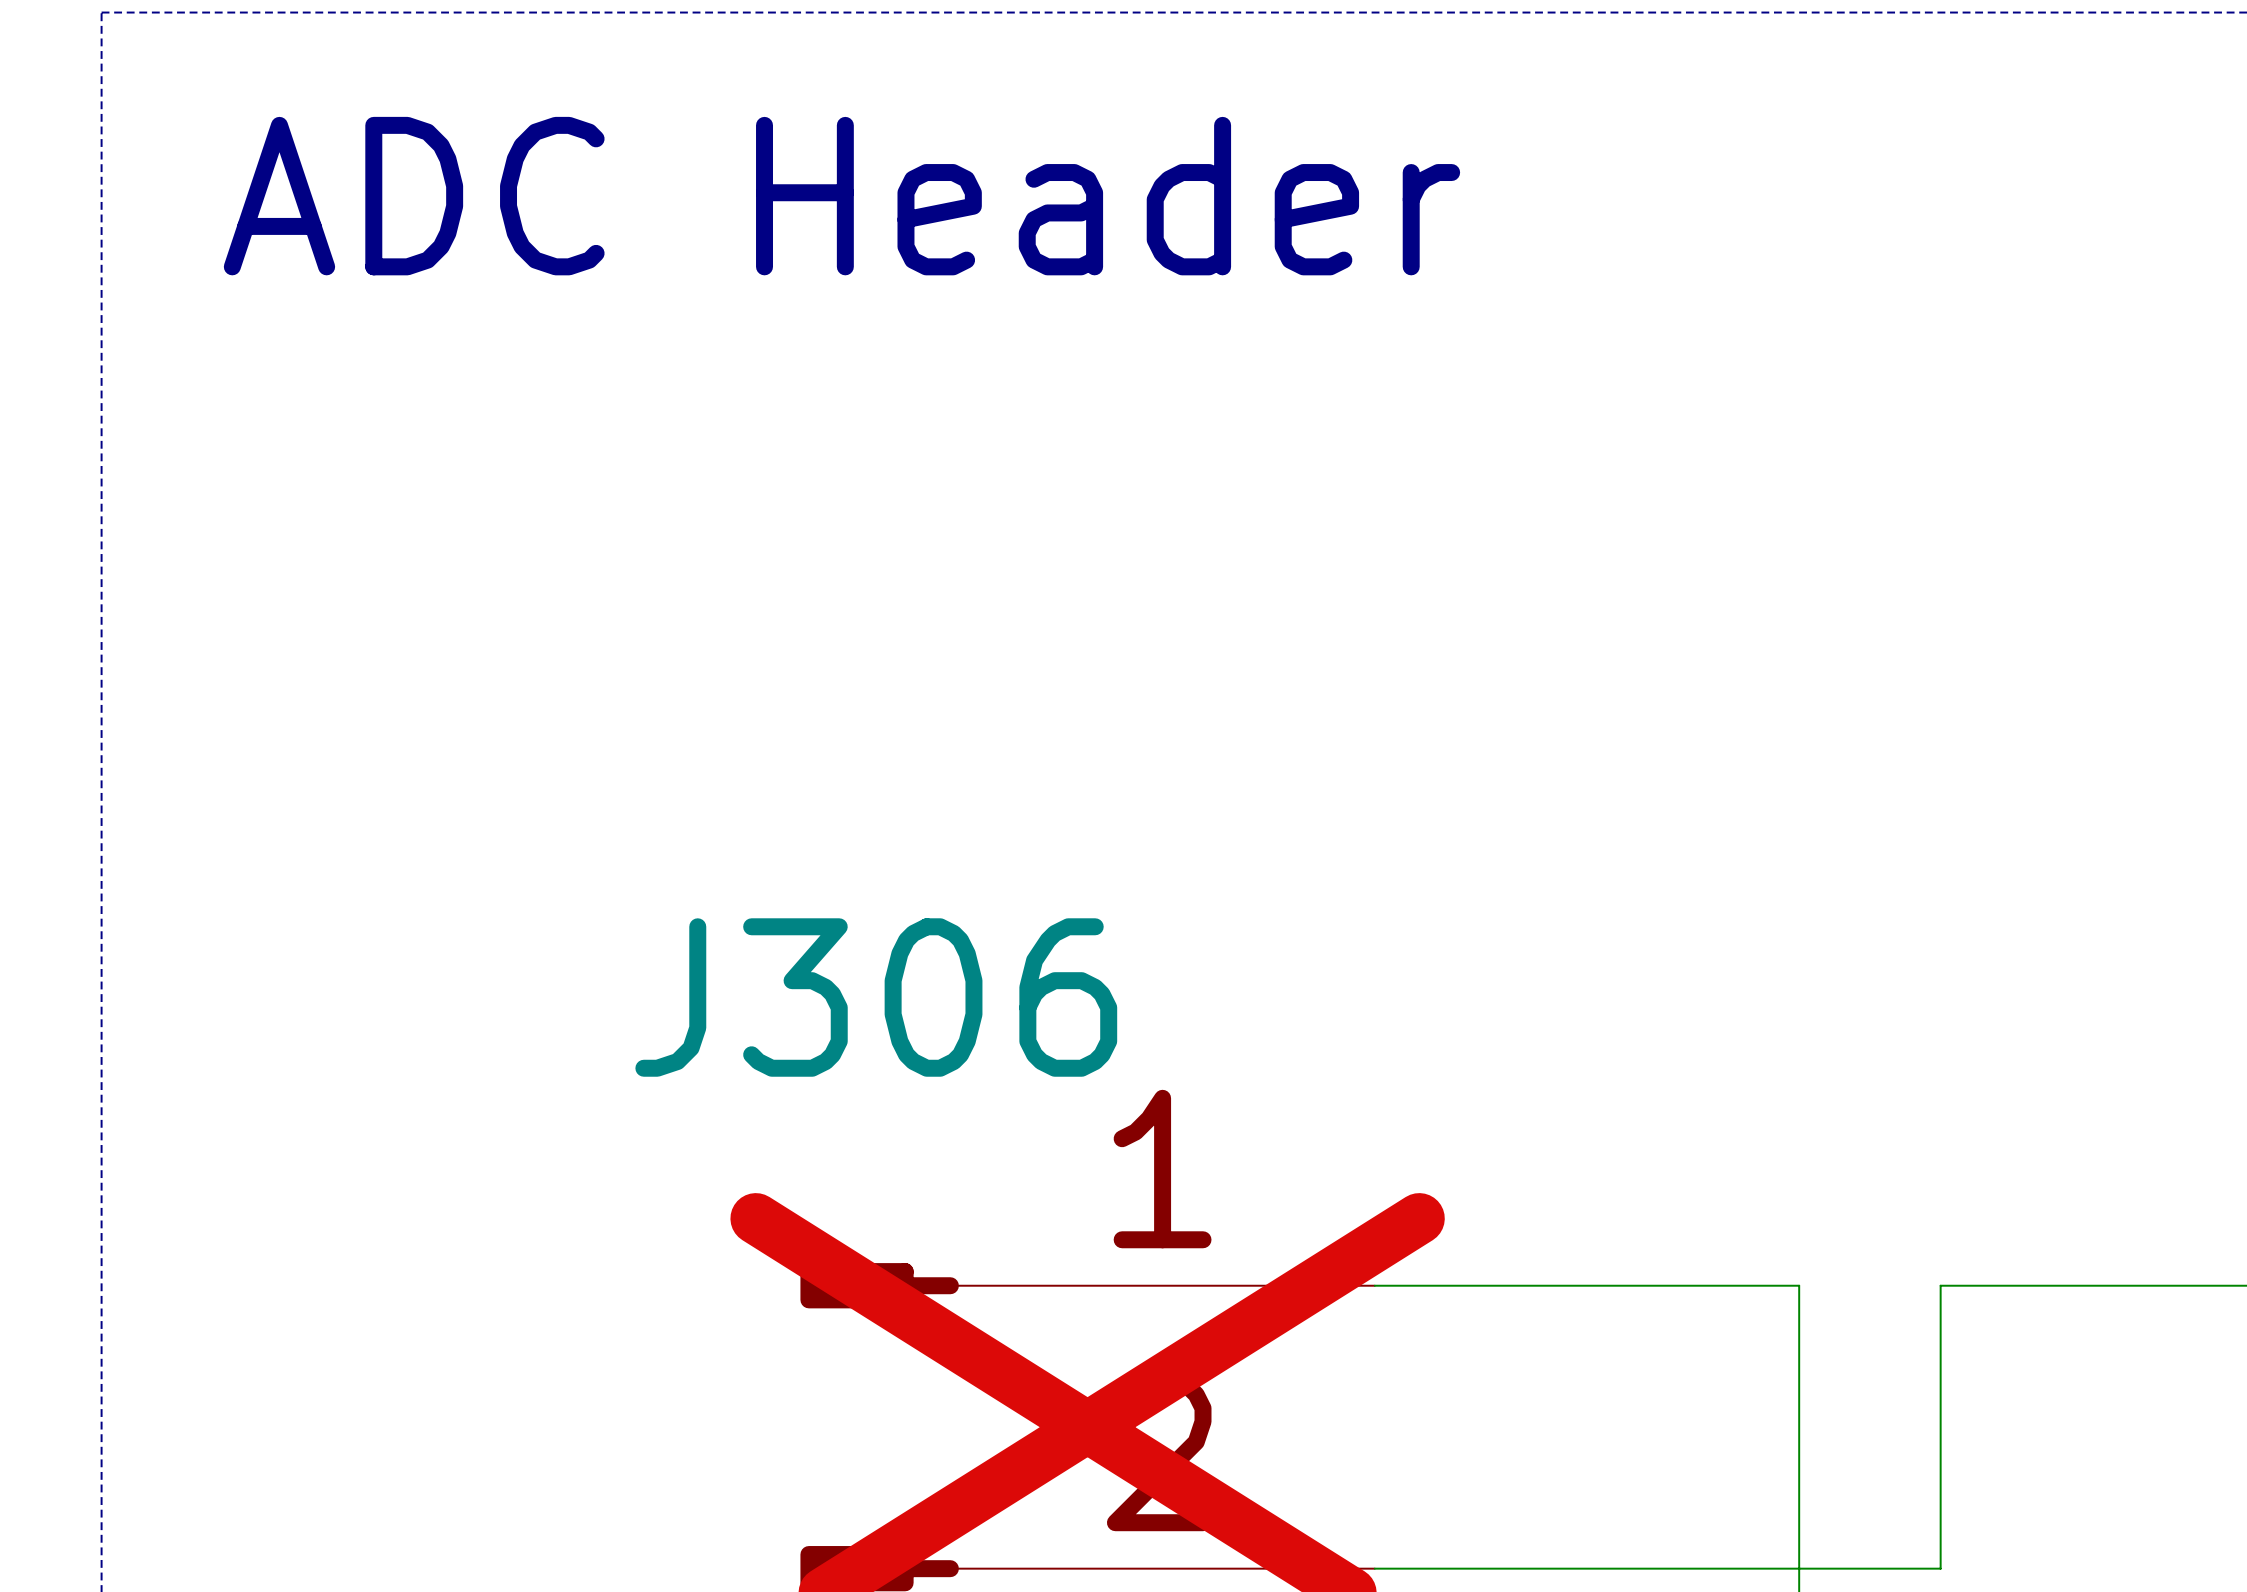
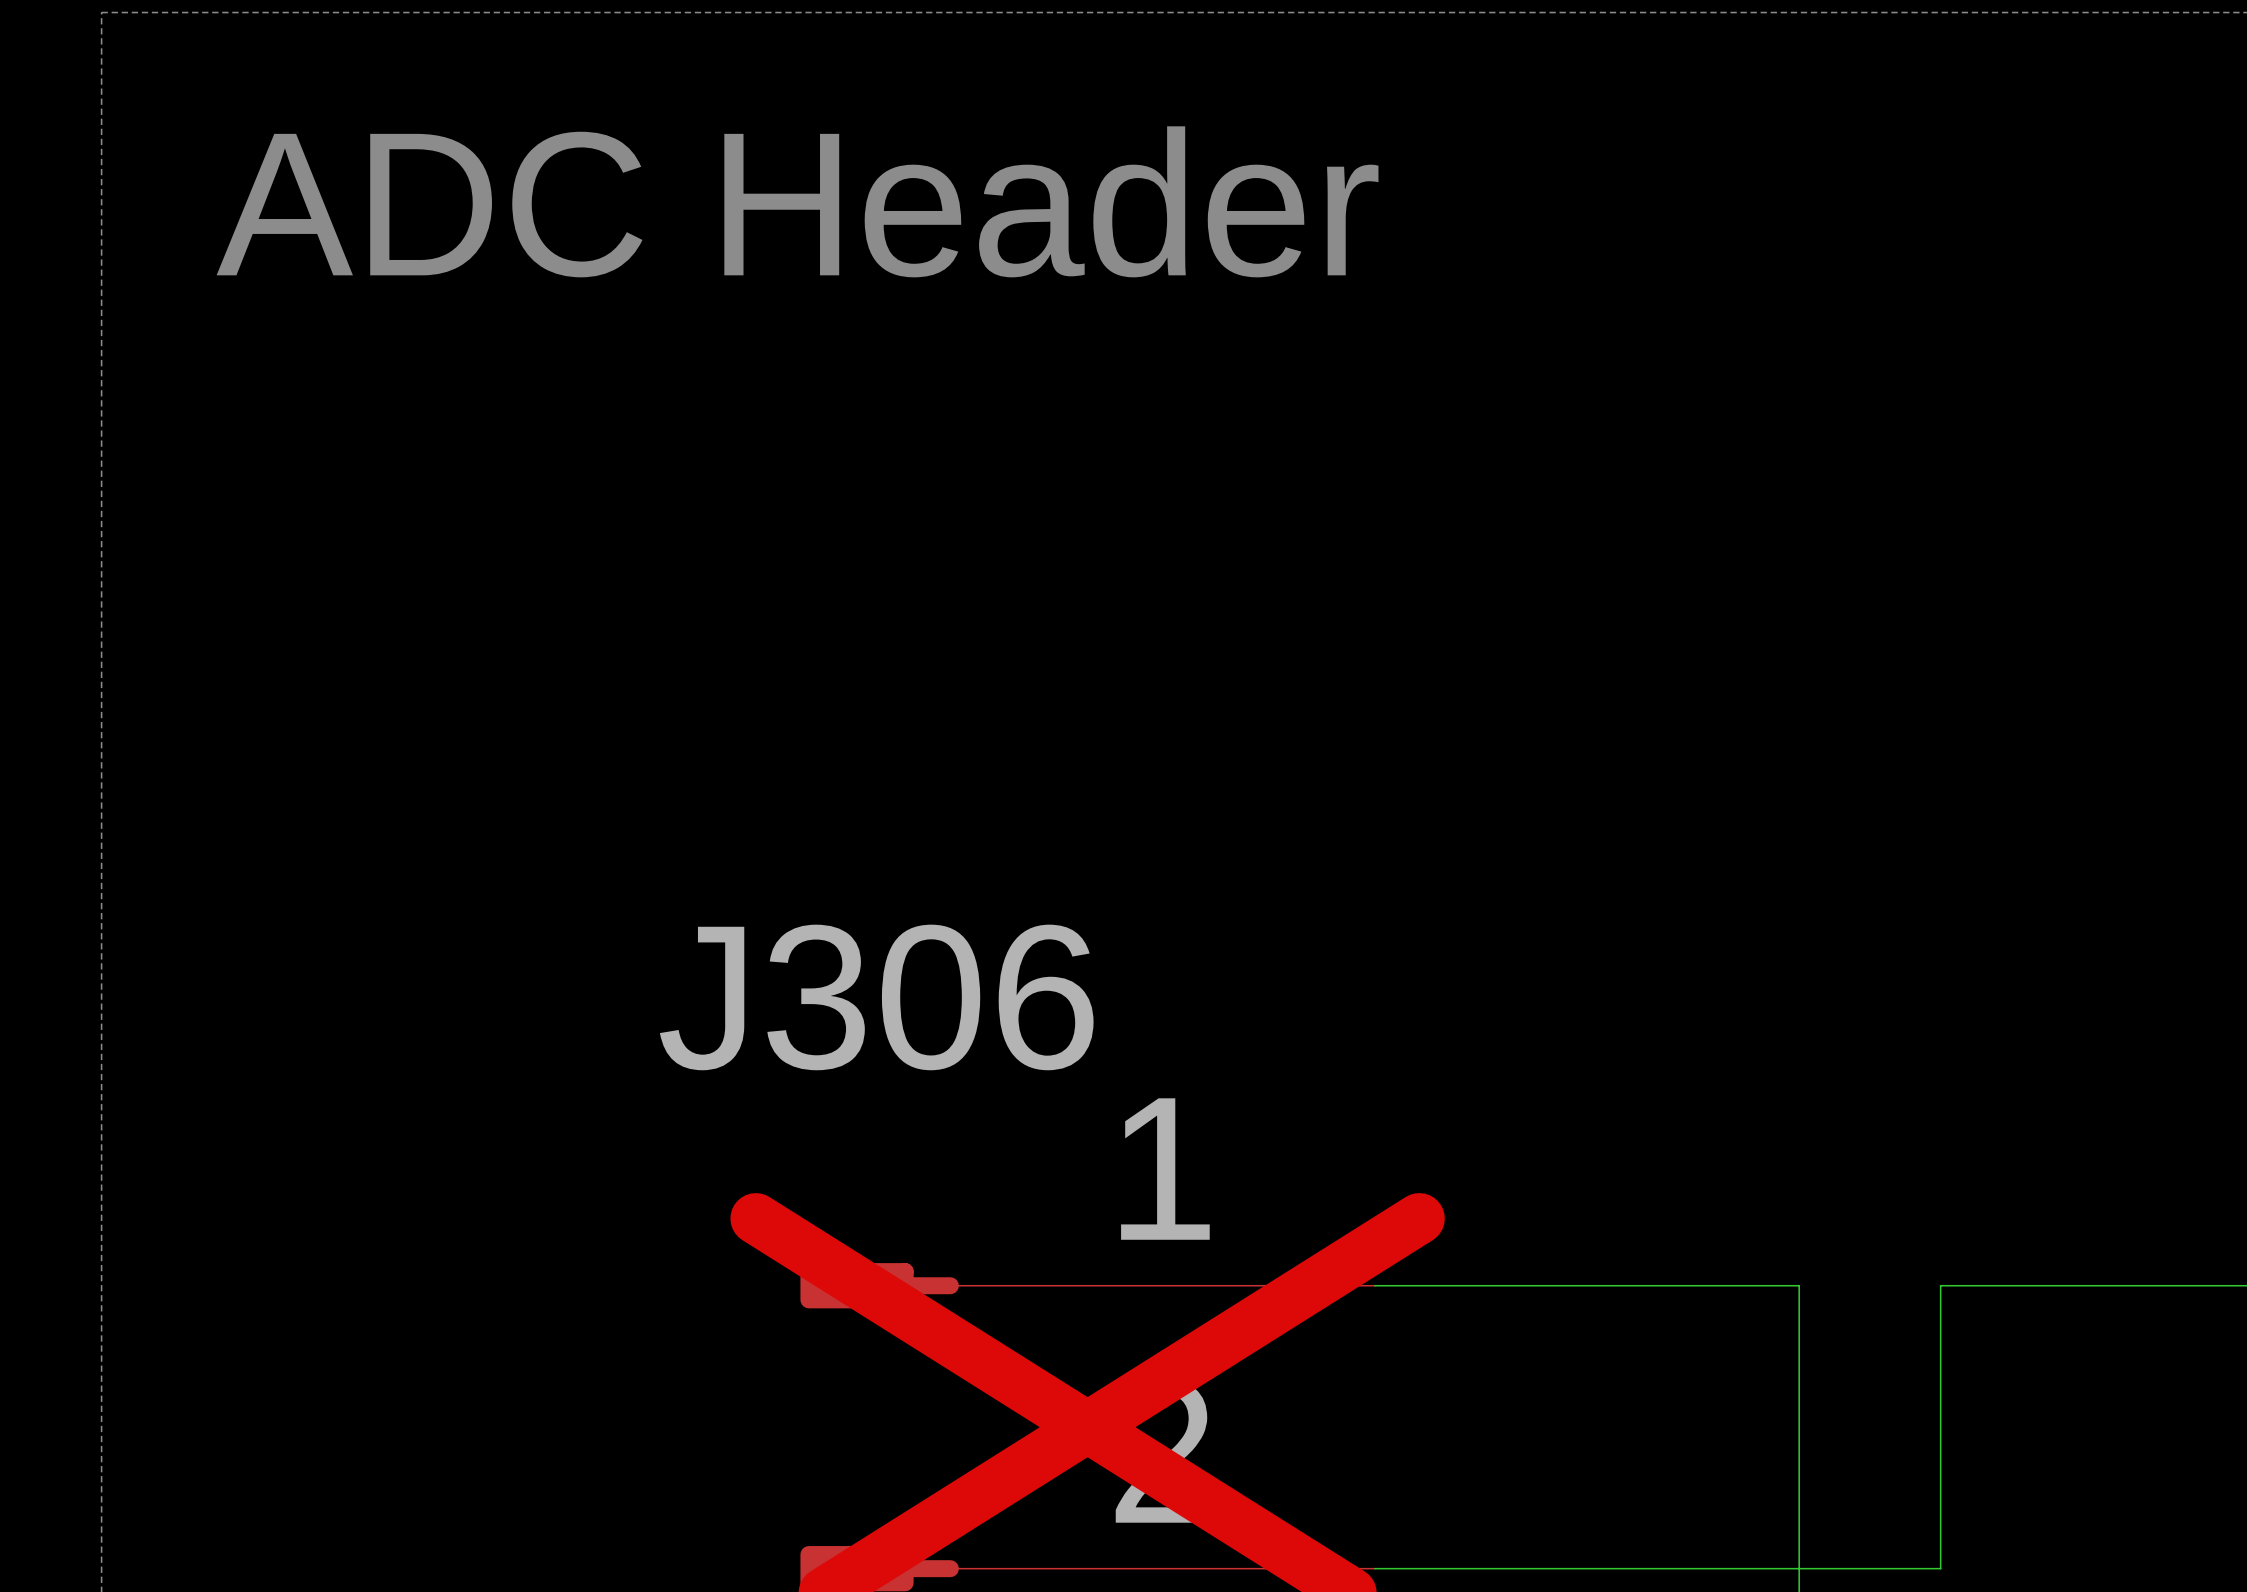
text position: ADC Header (841, 196) -> ADC Header (797, 201)

